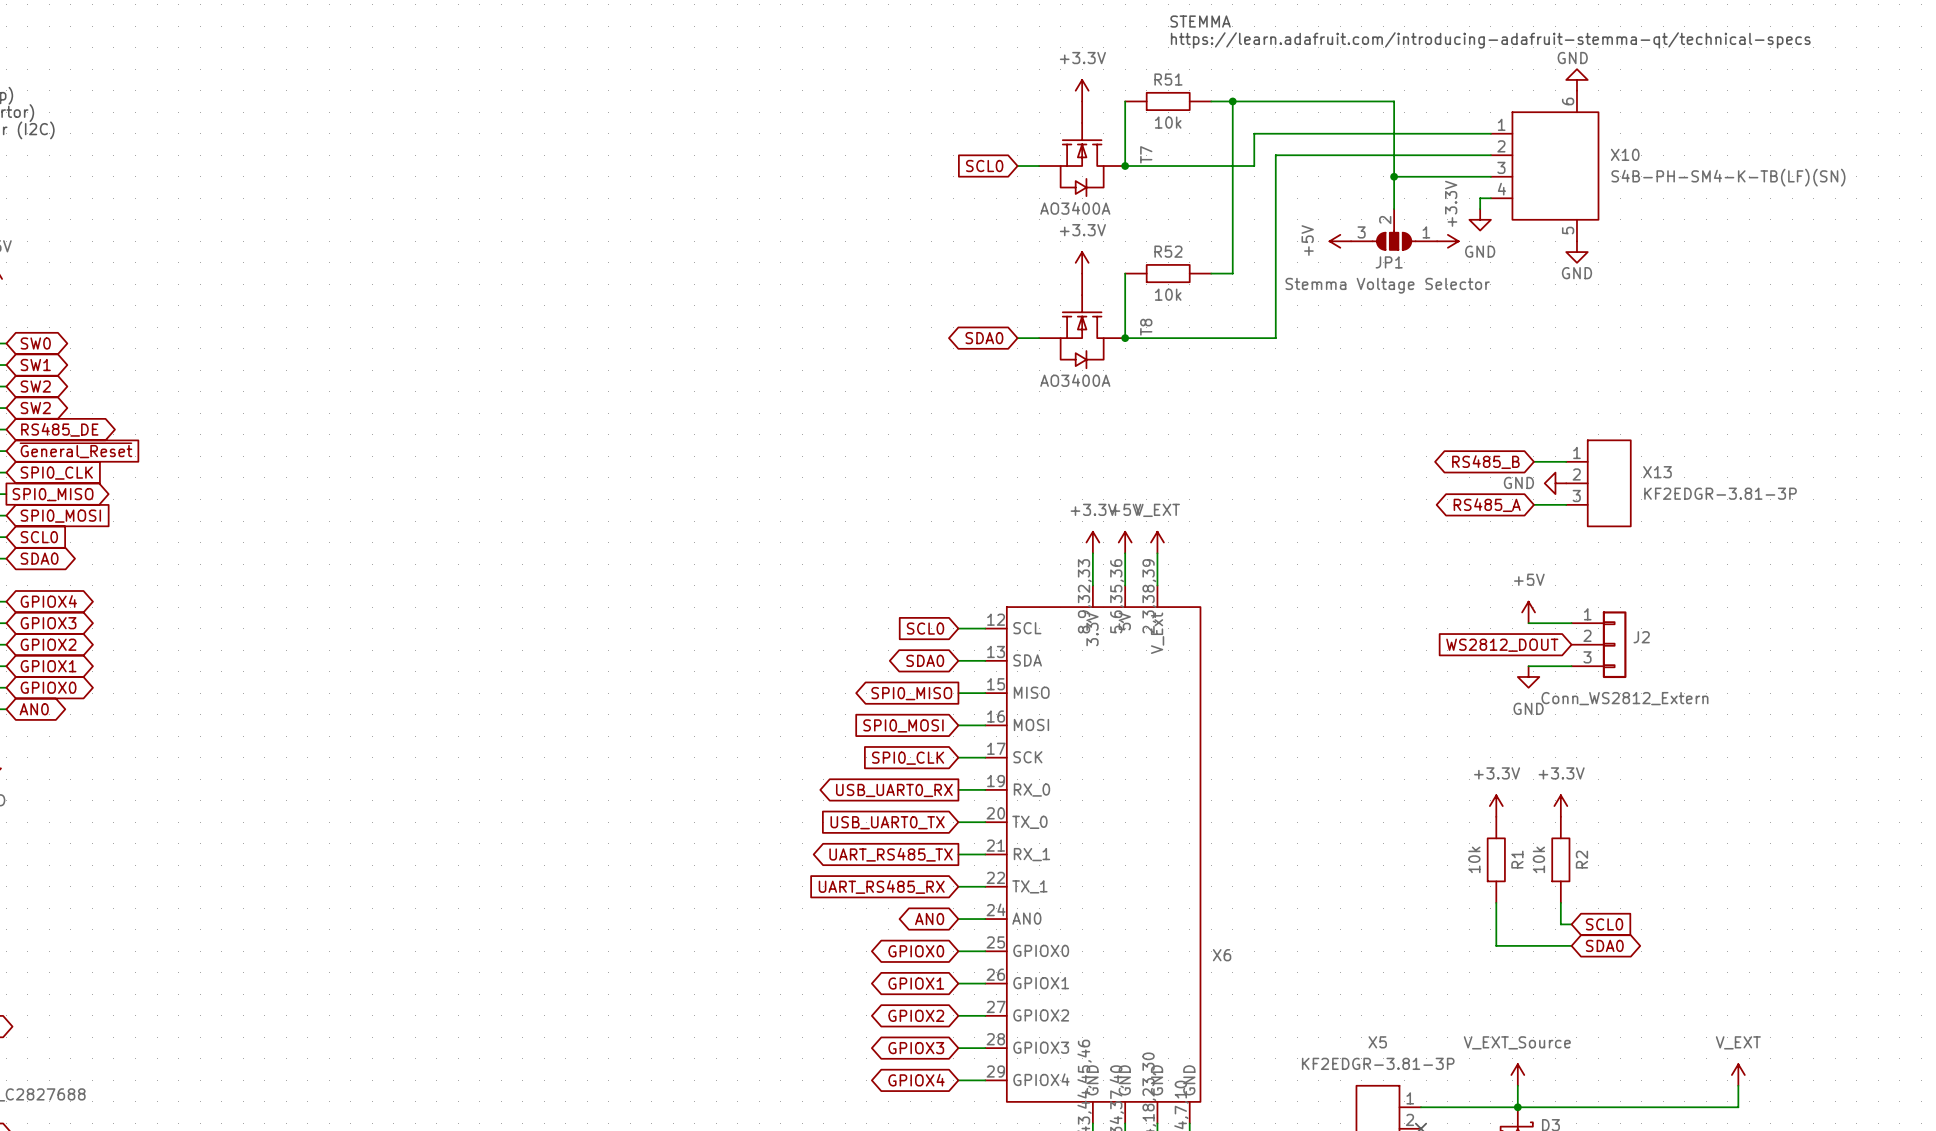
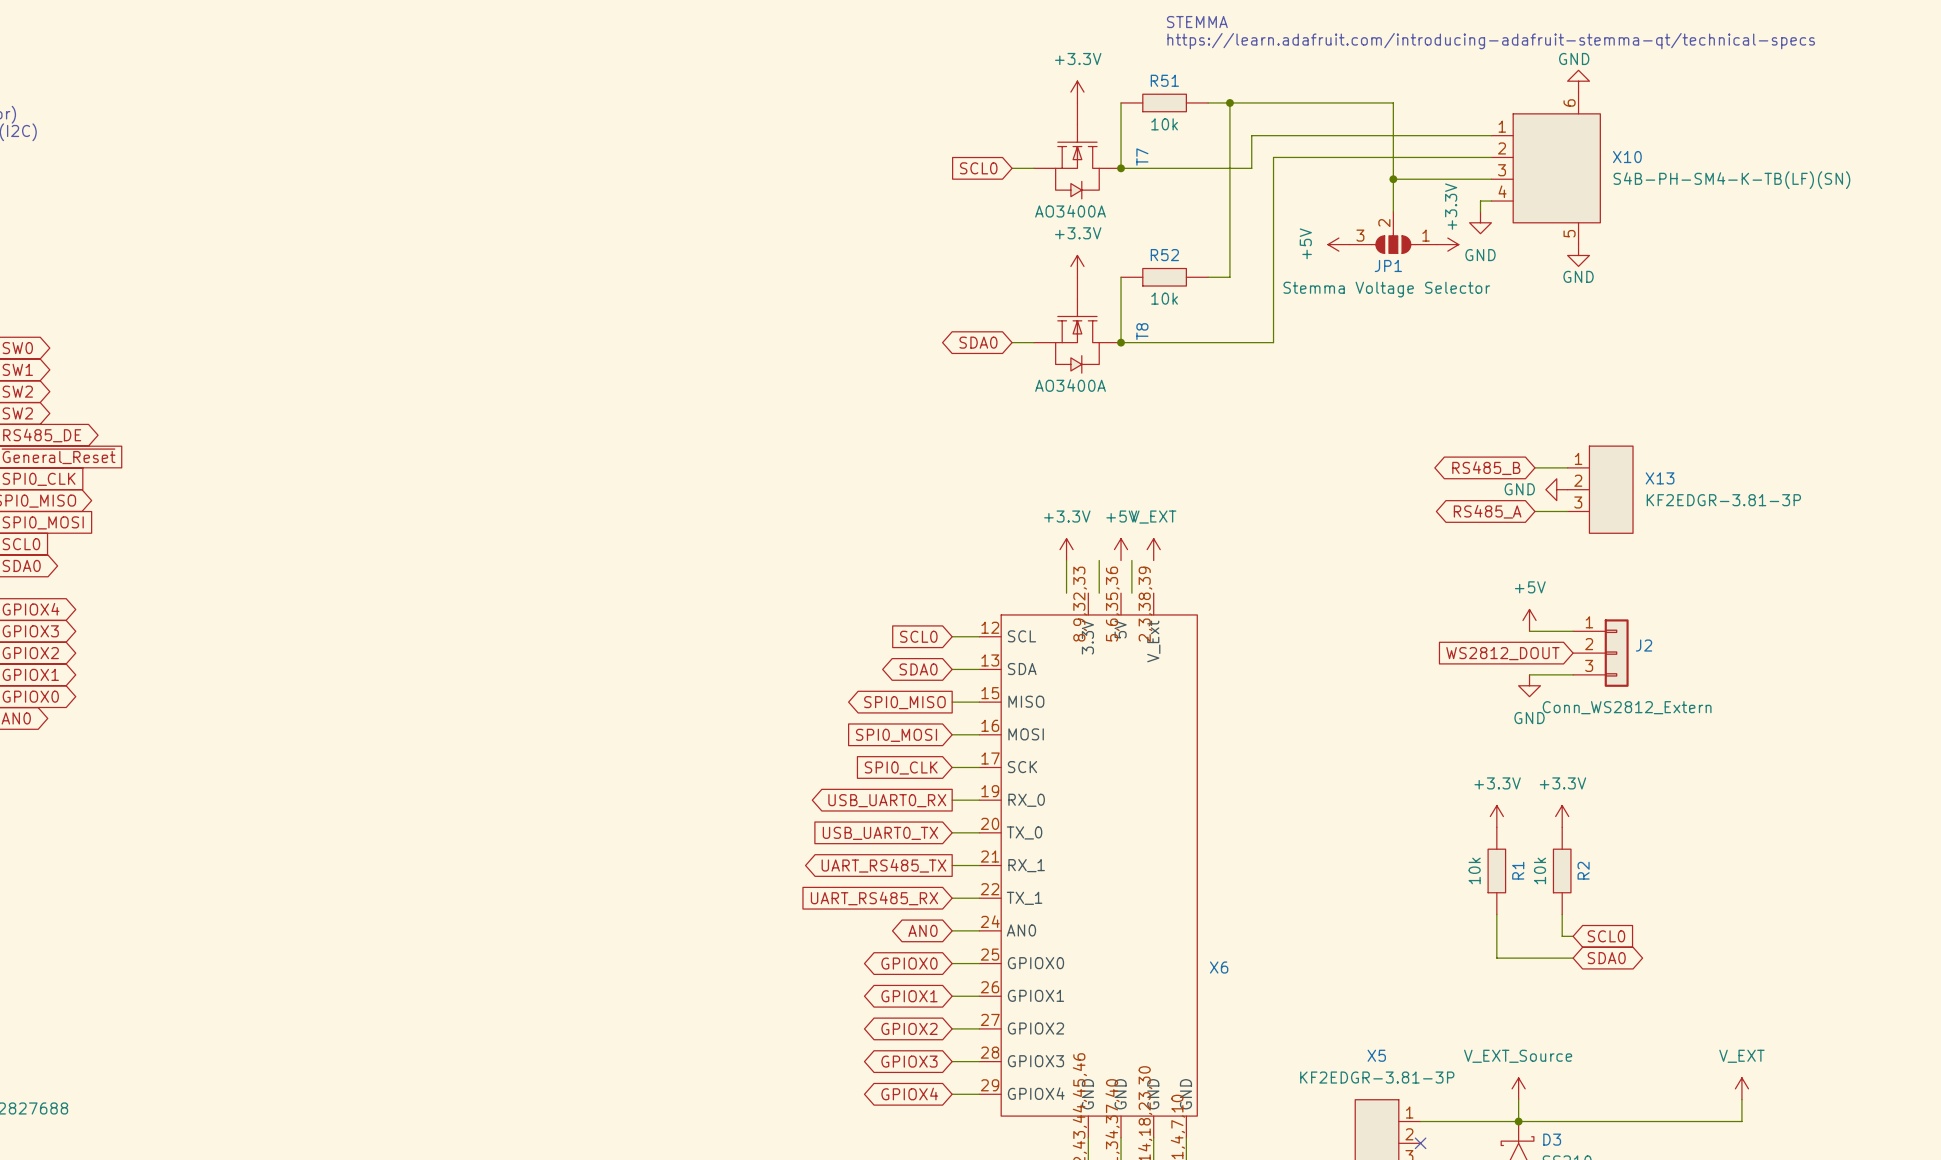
power symbol position: +3.3V (1092, 542) -> +3.3V (1066, 549)
wire: (1092, 553) (1092, 585) -> (1066, 560) (1066, 593)
wire: (1125, 553) (1125, 585) -> (1099, 560) (1099, 593)
wire: (1157, 553) (1157, 585) -> (1131, 560) (1131, 593)

